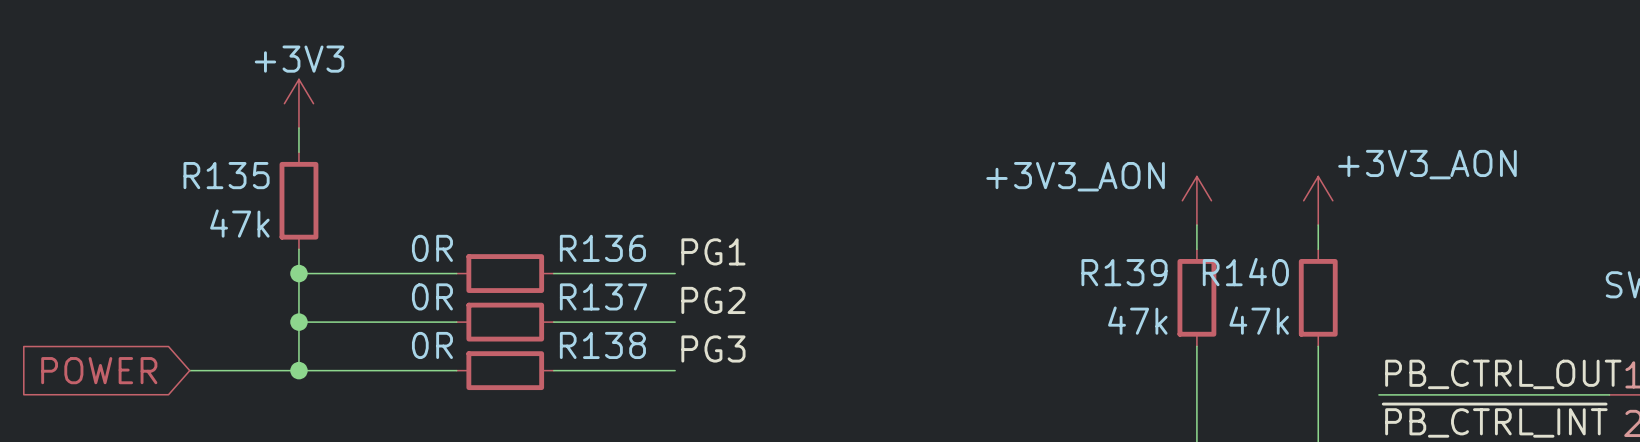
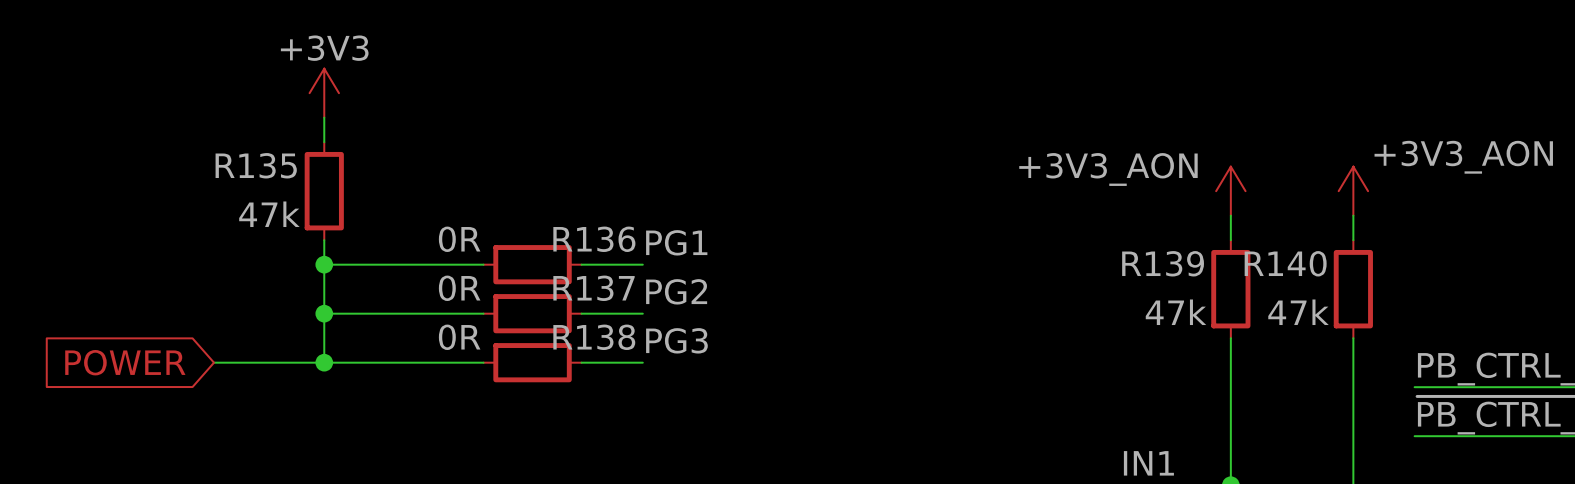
R136 name position: R136 (602, 248) -> R136 (594, 239)
label position: PG1 (713, 251) -> PG1 (676, 242)
wire: (614, 273) (675, 273) -> none
R137 name position: R137 (603, 296) -> R137 (594, 288)
label position: PG2 (713, 300) -> PG2 (676, 291)
wire: (614, 322) (675, 322) -> none
R138 name position: R138 (602, 345) -> R138 (594, 337)
label position: PG3 (713, 348) -> PG3 (676, 340)
wire: (614, 370) (675, 370) -> none

